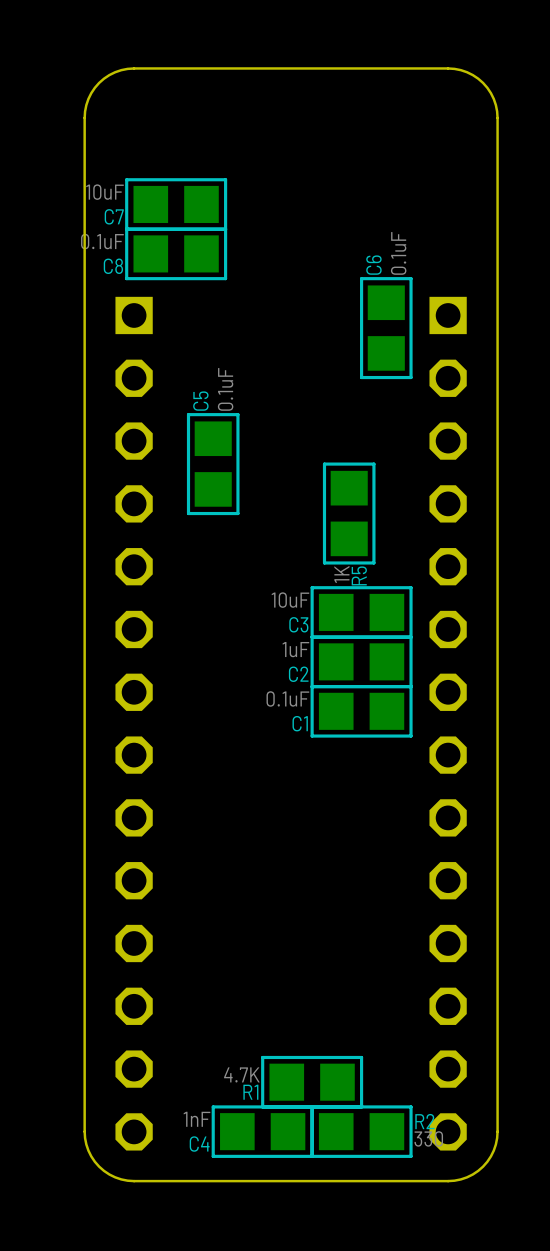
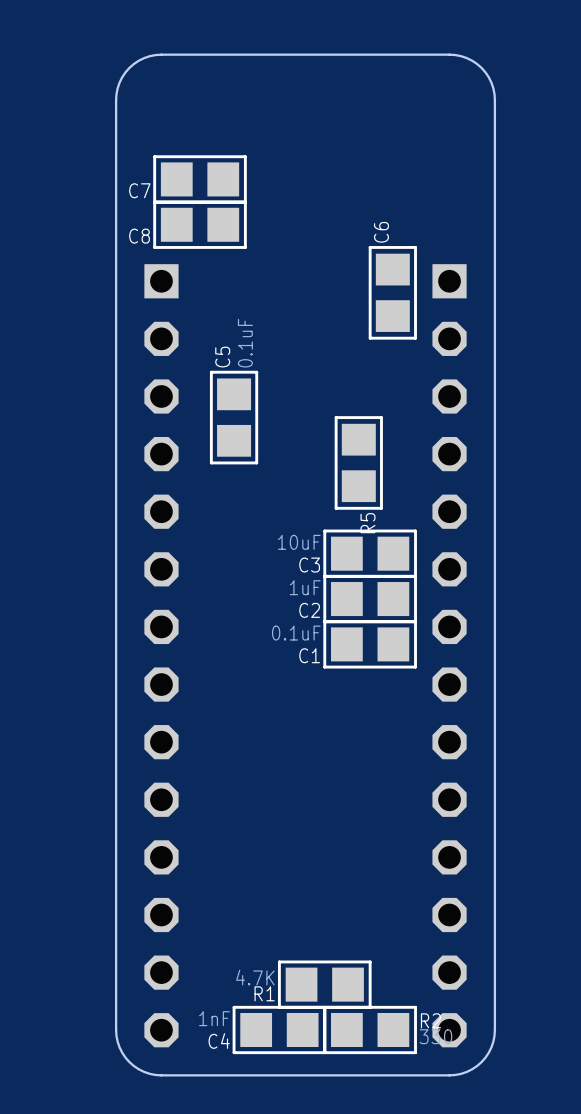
C7 value: 10uF (105, 192) -> none
C8 value: 0.1uF (102, 241) -> none
C6 value: 0.1uF (398, 253) -> none
R5 value: 1K (341, 574) -> none

